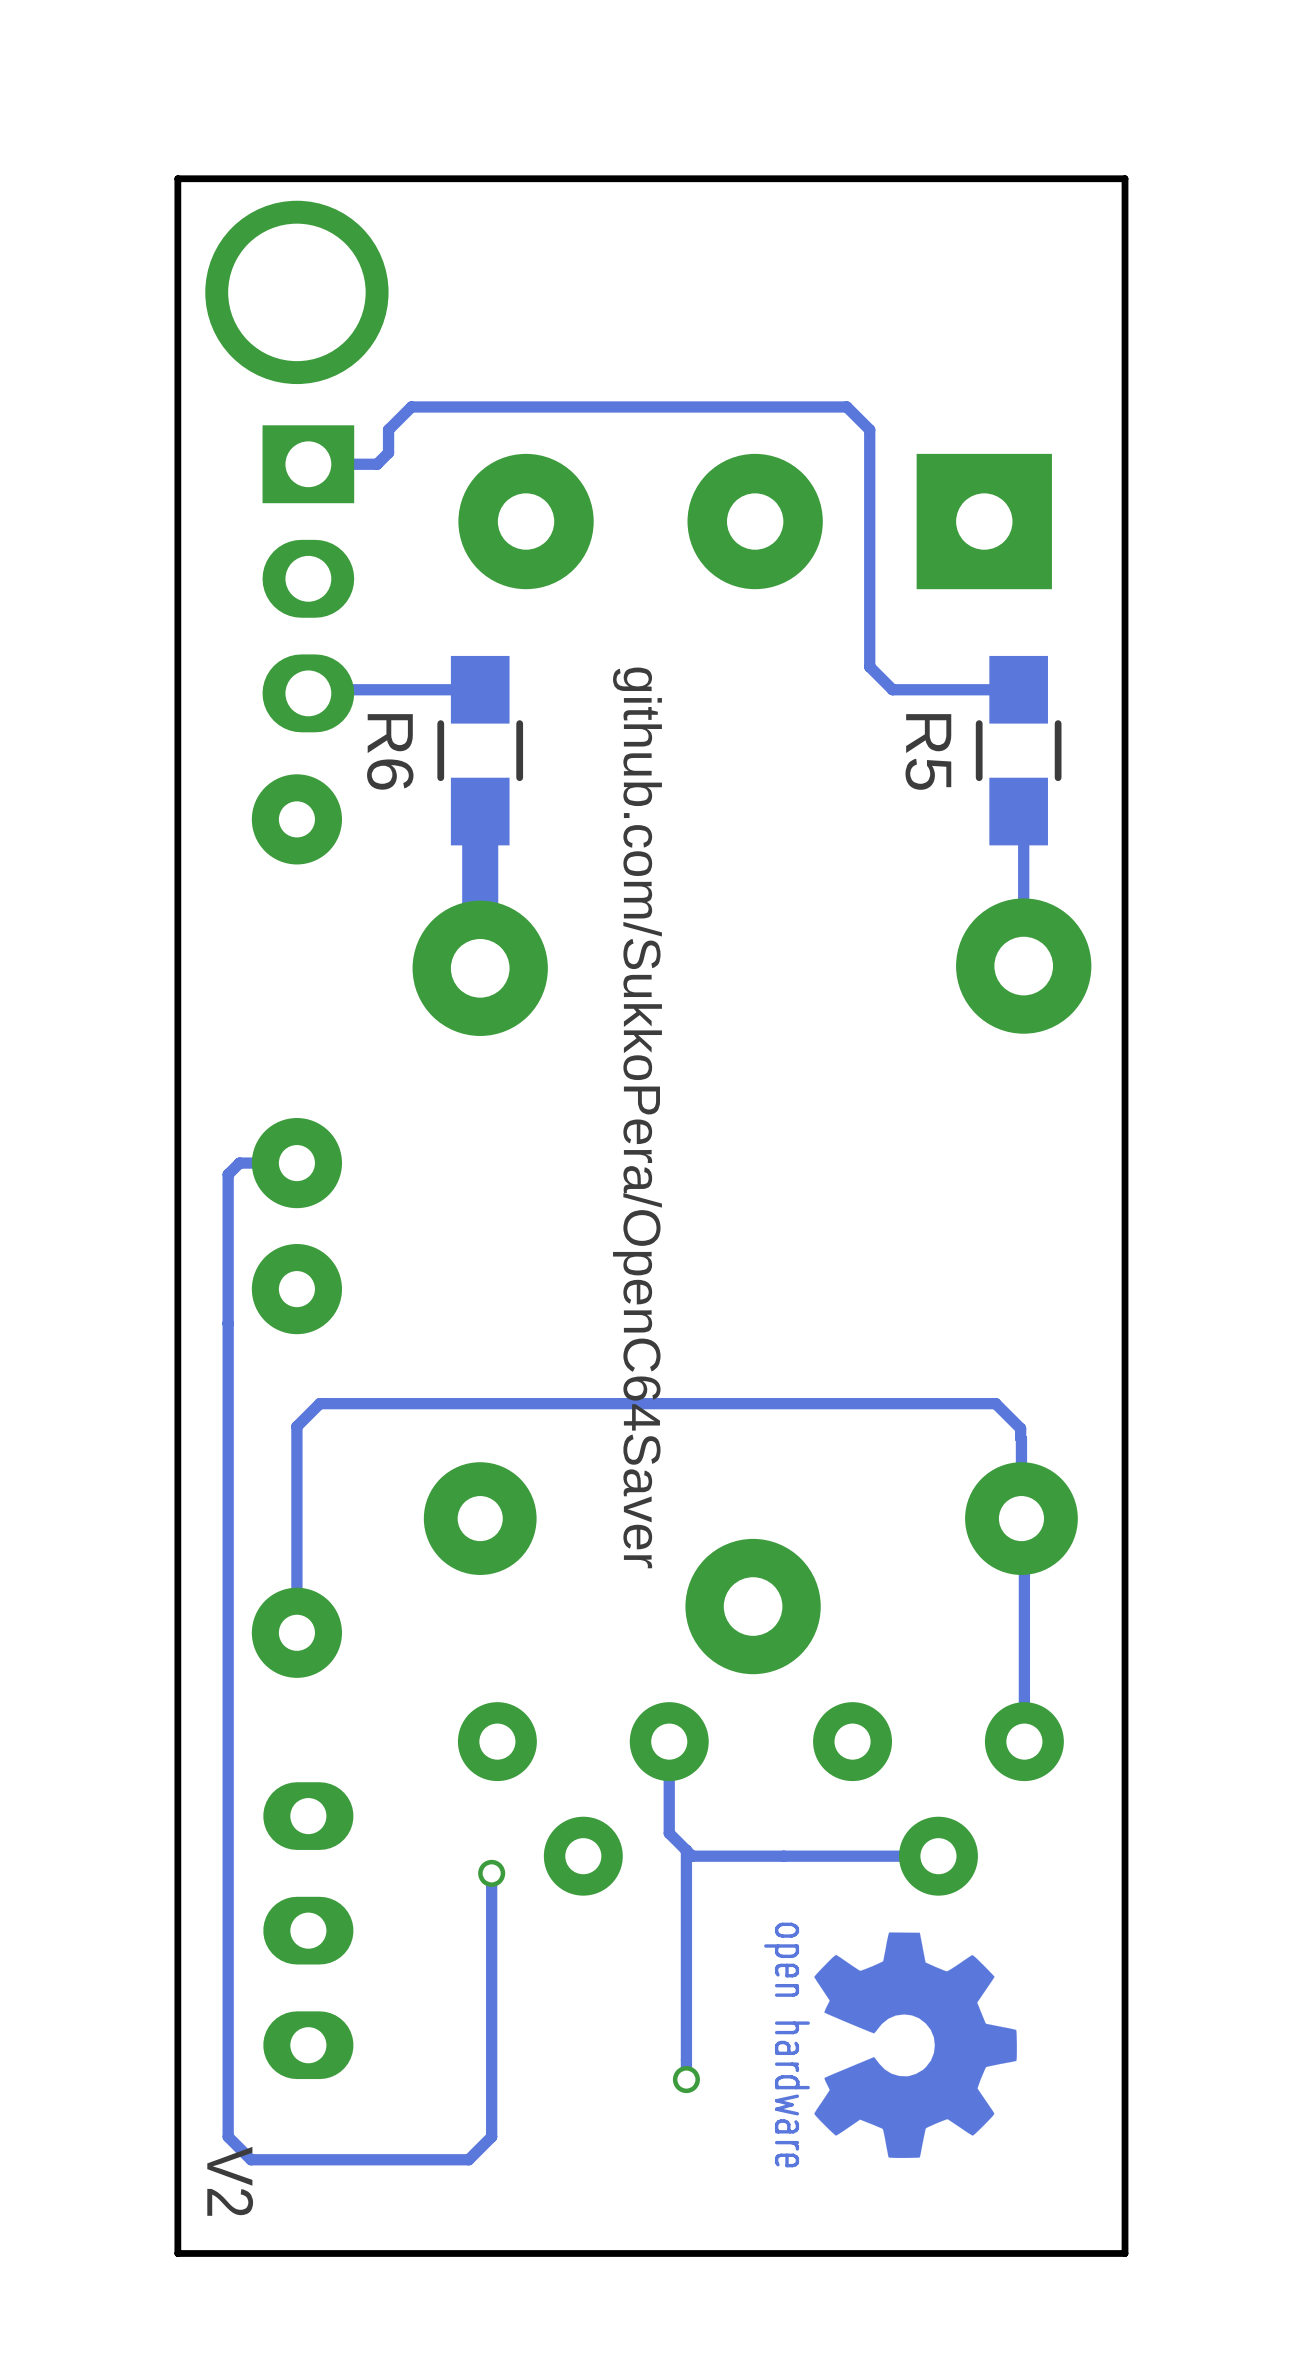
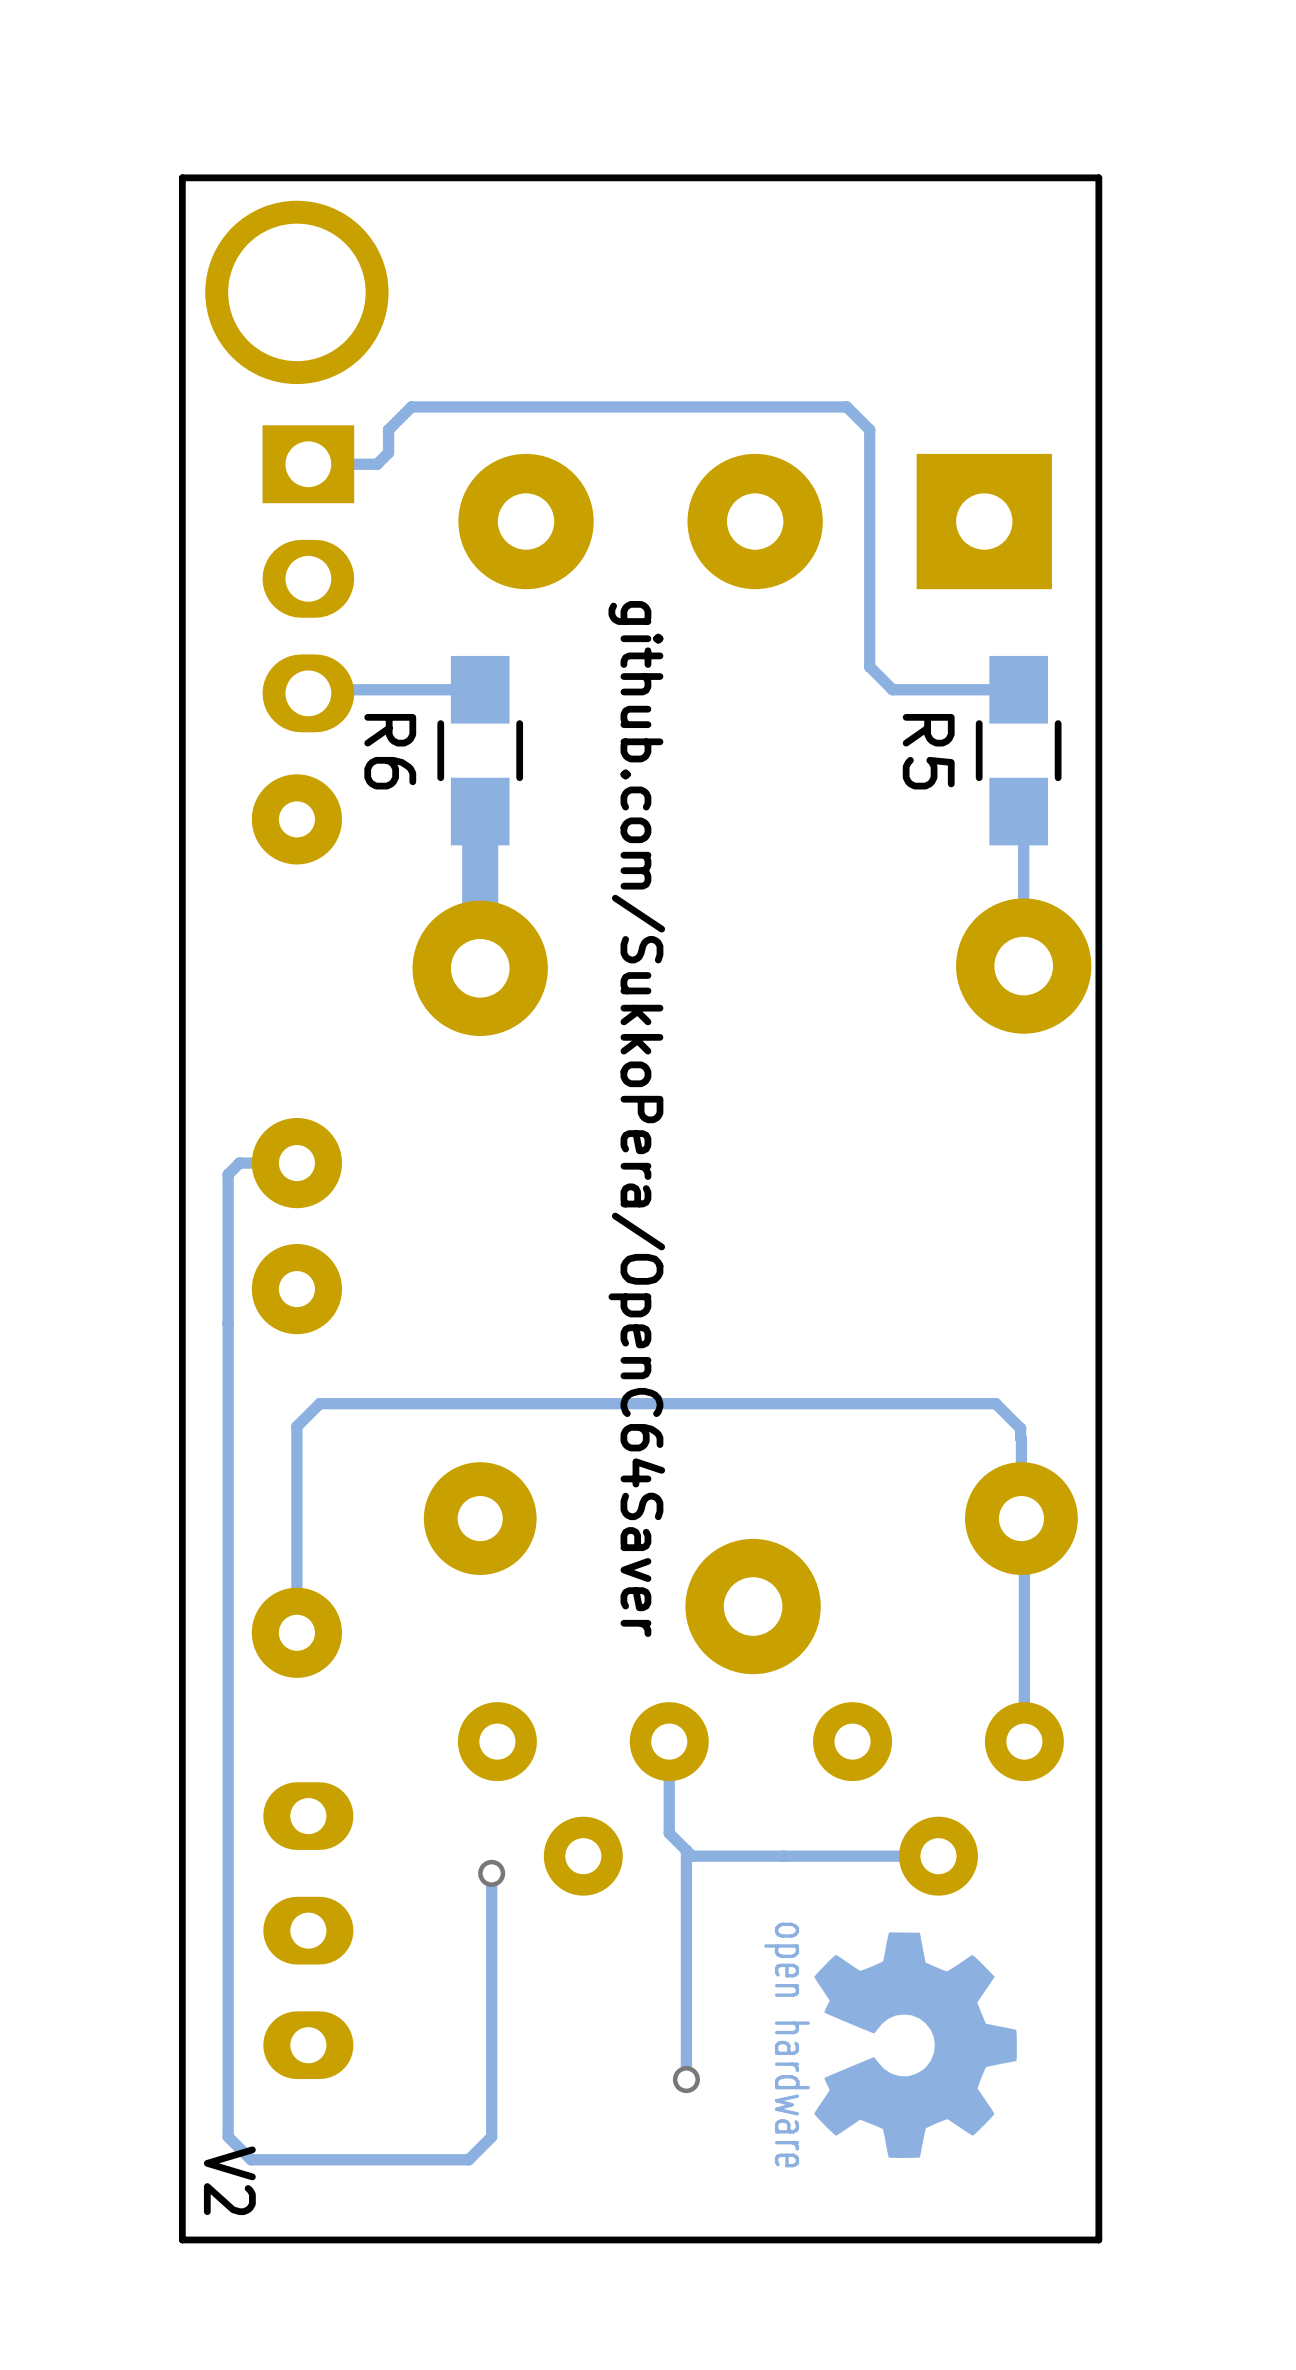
board edge: (1125, 178) (1125, 2253) (177, 2253) (177, 178) (1125, 178) -> (1098, 177) (1098, 2239) (182, 2239) (182, 177) (1098, 177)

